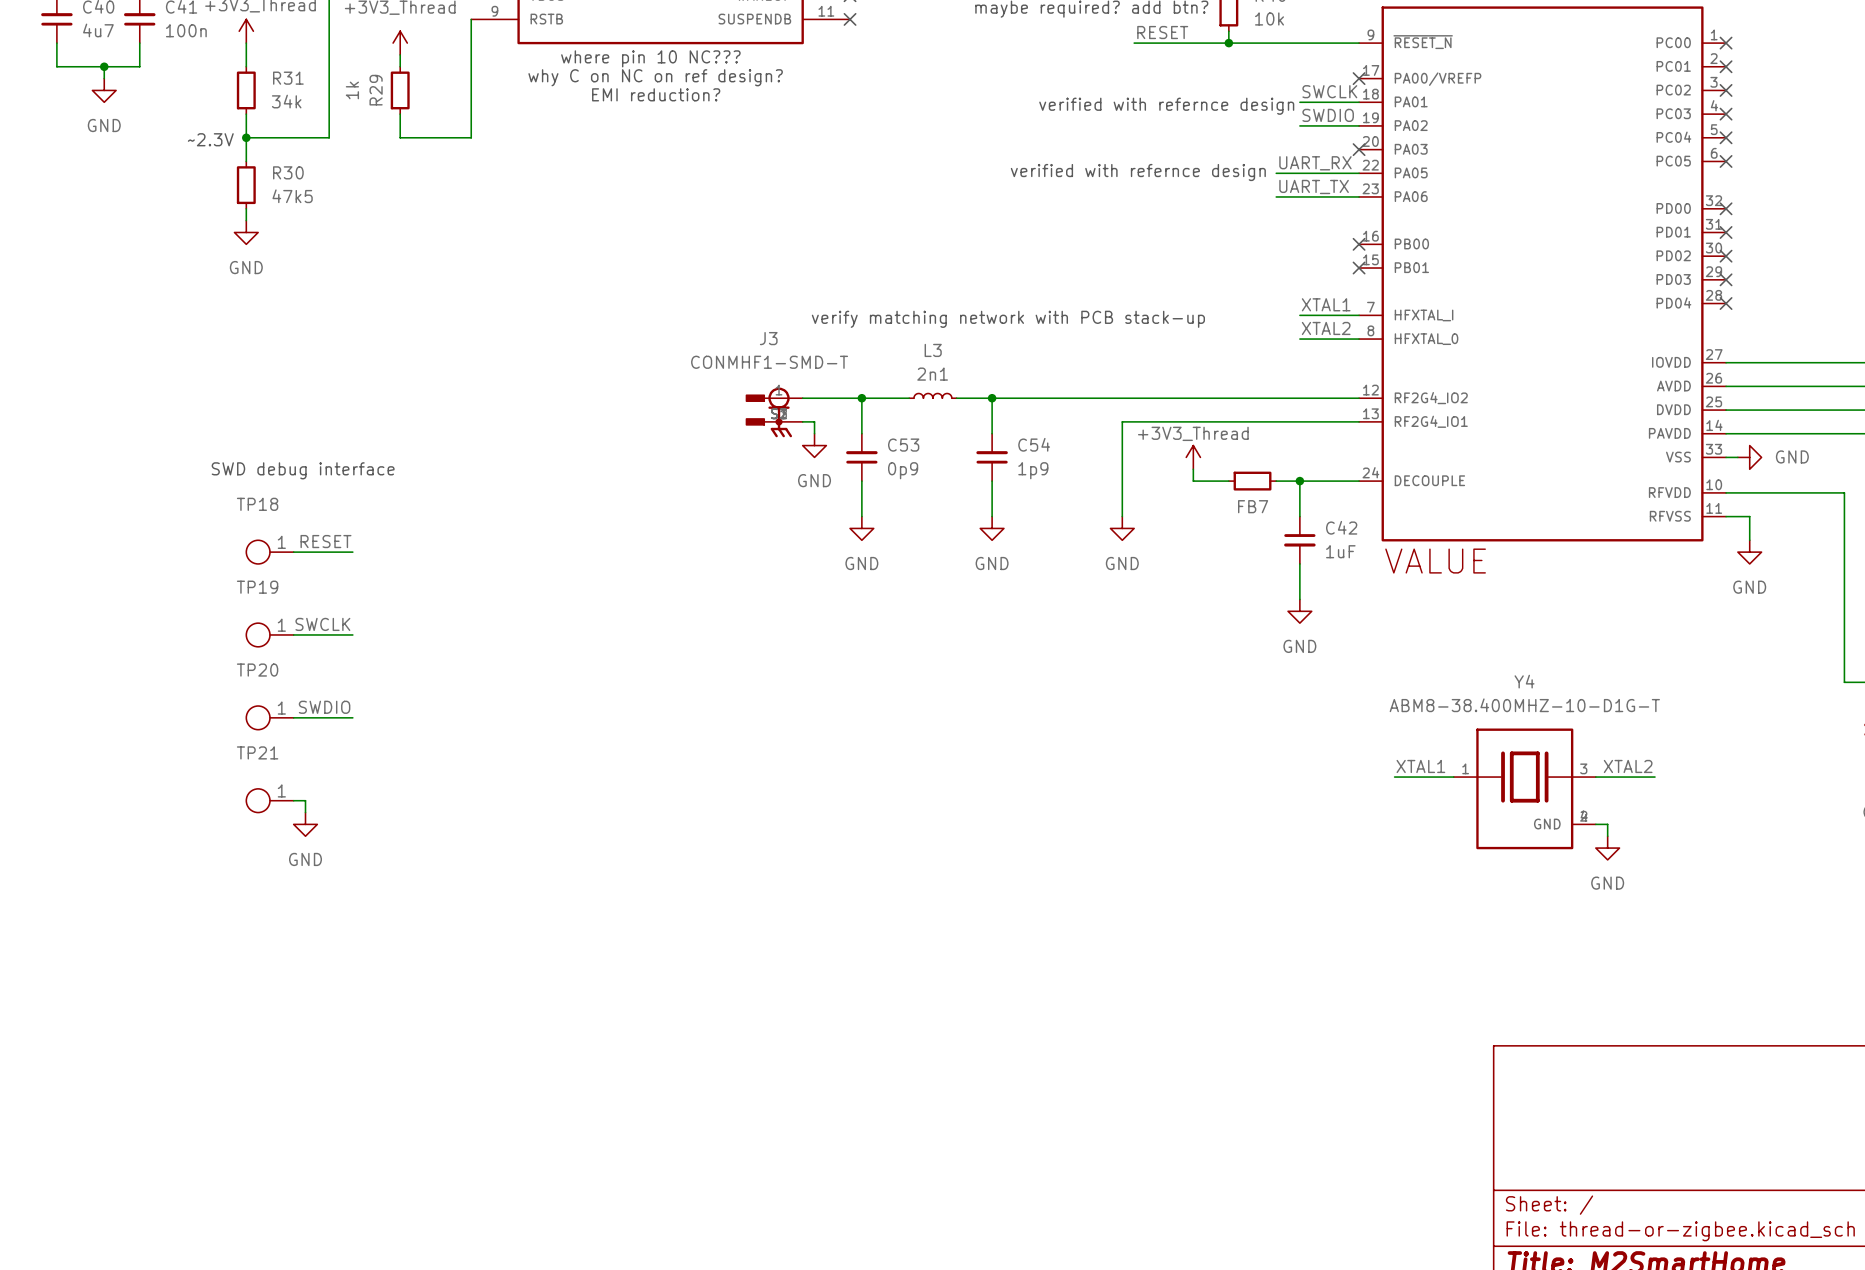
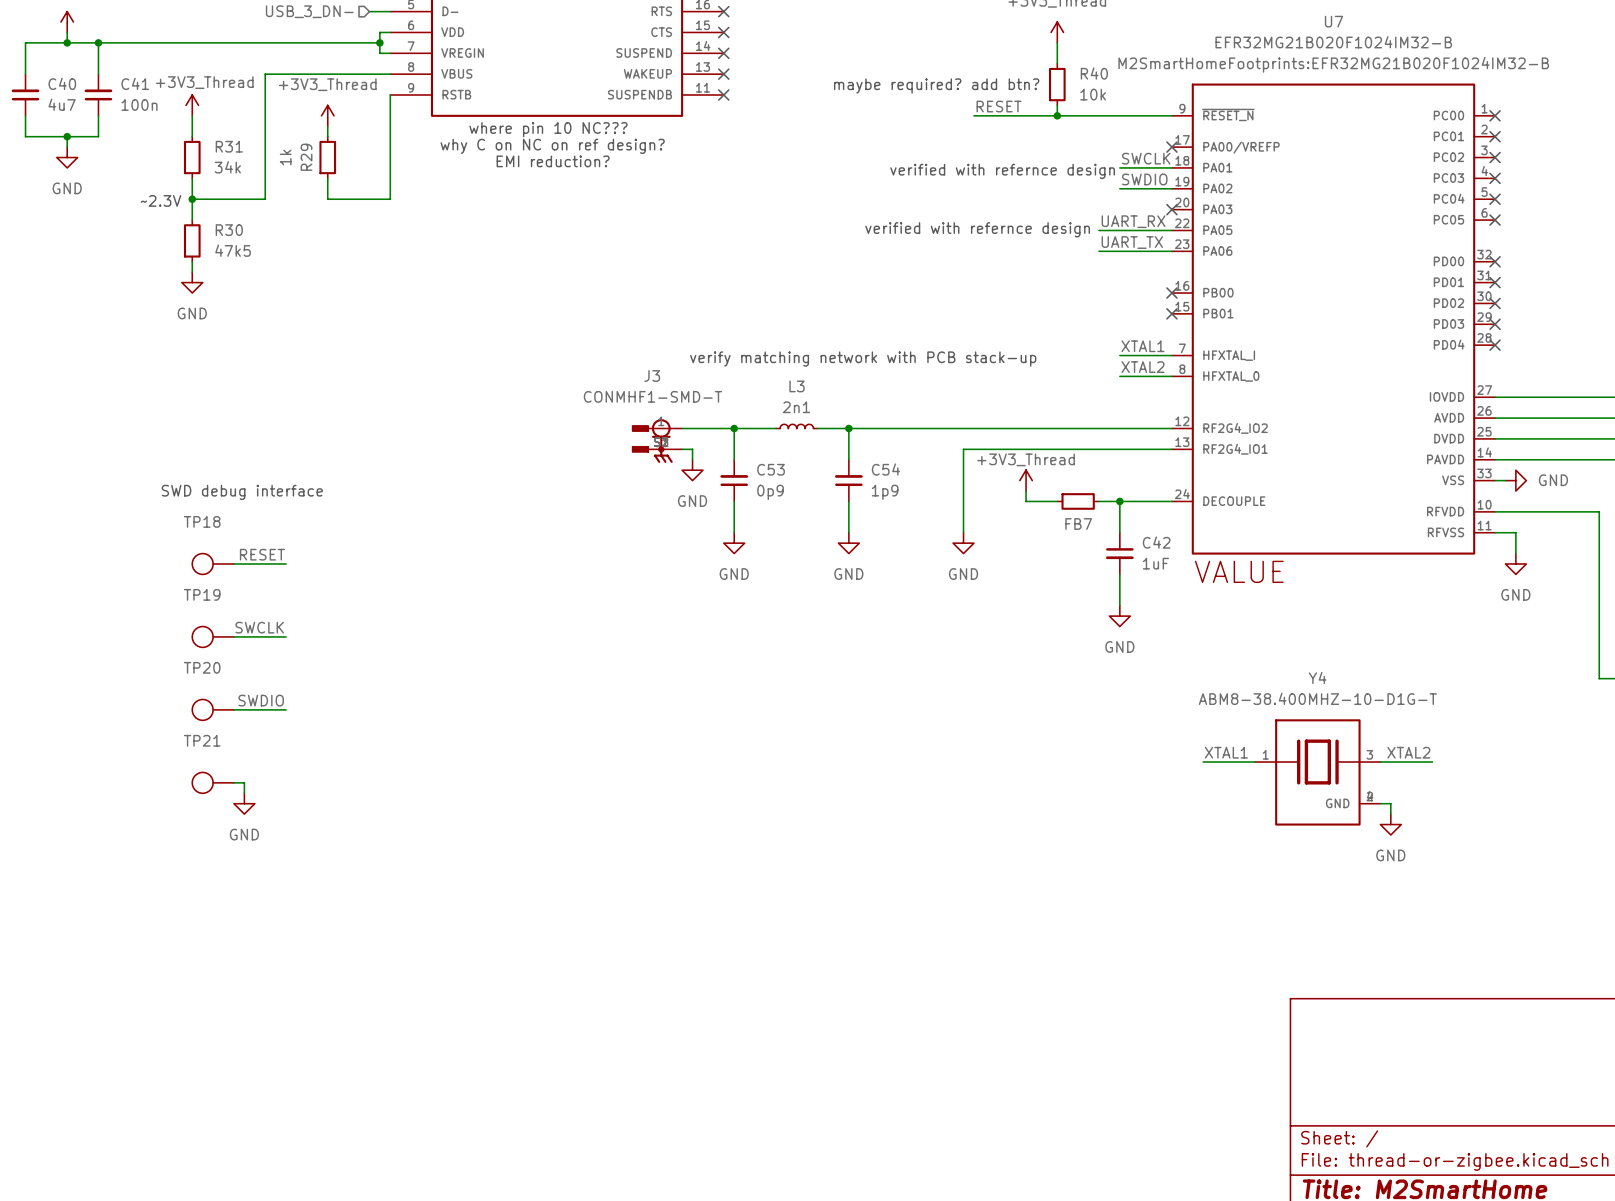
TP18 pin number: 1 (281, 542) -> none
TP19 pin number: 1 (281, 625) -> none
TP20 pin number: 1 (281, 708) -> none
TP21 pin number: 1 (281, 790) -> none

